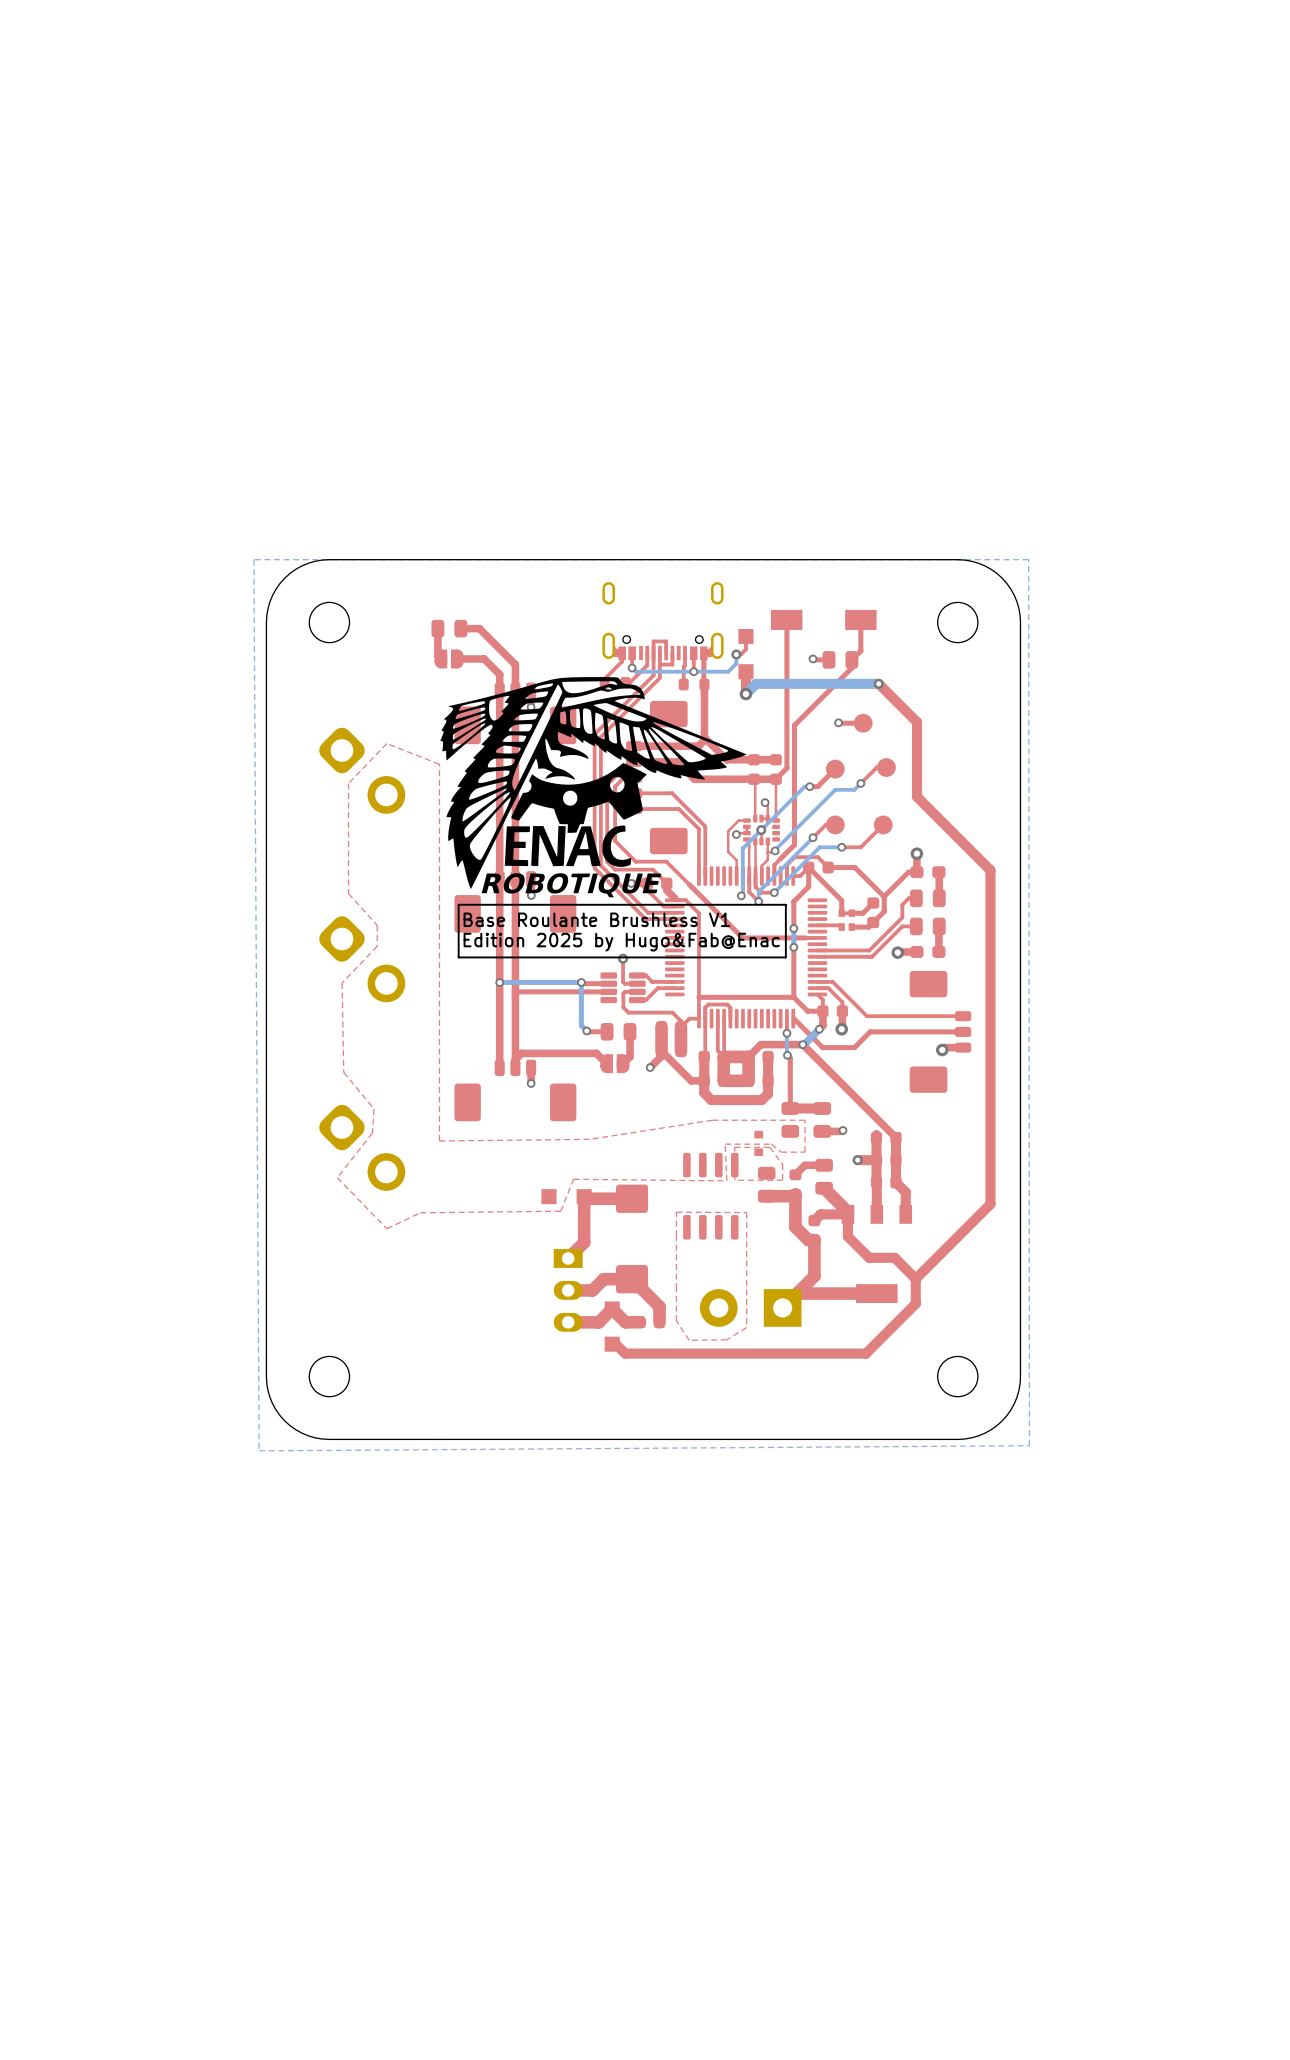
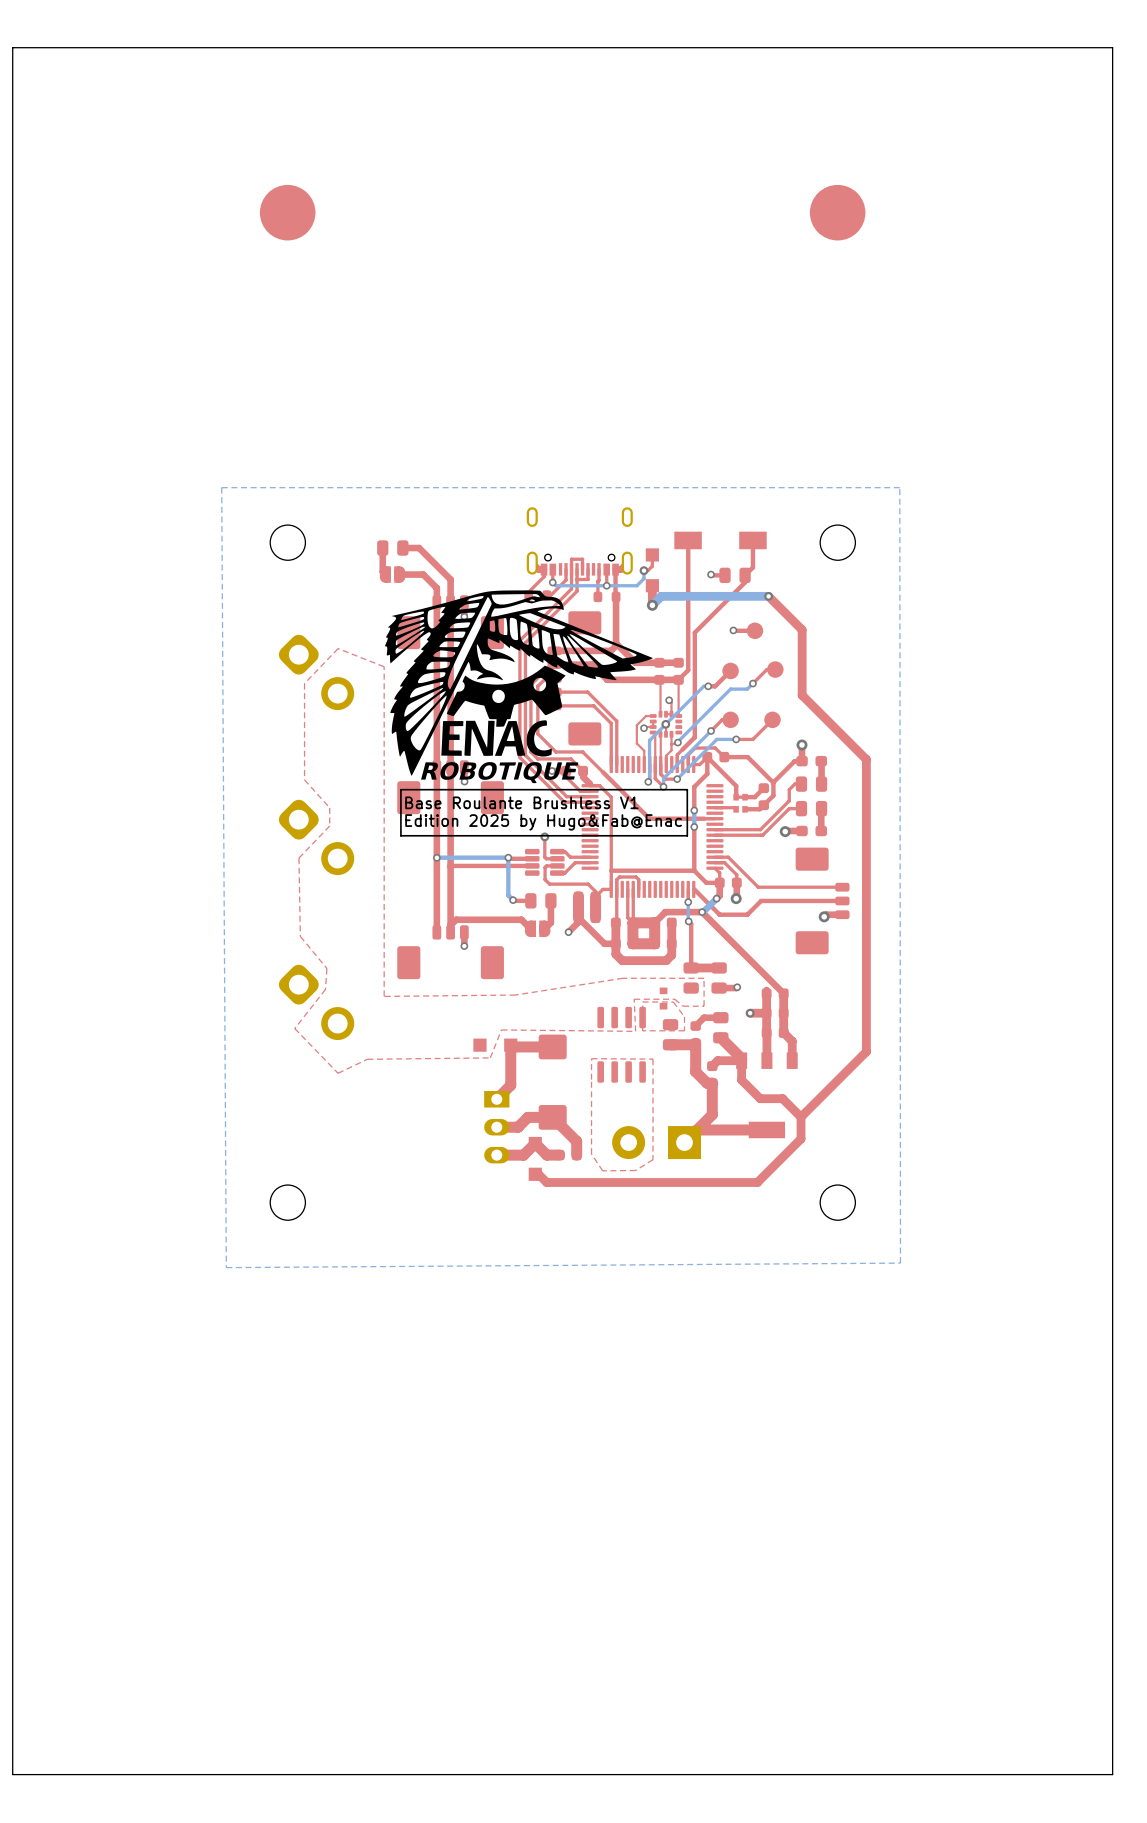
board edge: none -> (1112, 47) (12, 47) (12, 1774) (1112, 1774) (1112, 47)
part: none -> (287, 212)
part: none -> (837, 212)
board edge: (957, 559) (329, 559) (315, 561) (302, 565) (290, 573) (280, 583) (269, 601) (266, 622) (266, 1376) (268, 1390) (272, 1403) (280, 1415) (290, 1425) (308, 1435) (329, 1439) (957, 1439) (971, 1437) (984, 1433) (996, 1425) (1006, 1415) (1016, 1397) (1020, 1376) (1020, 615) (1016, 601) (1010, 589) (996, 573) (978, 563) (957, 559) -> none

